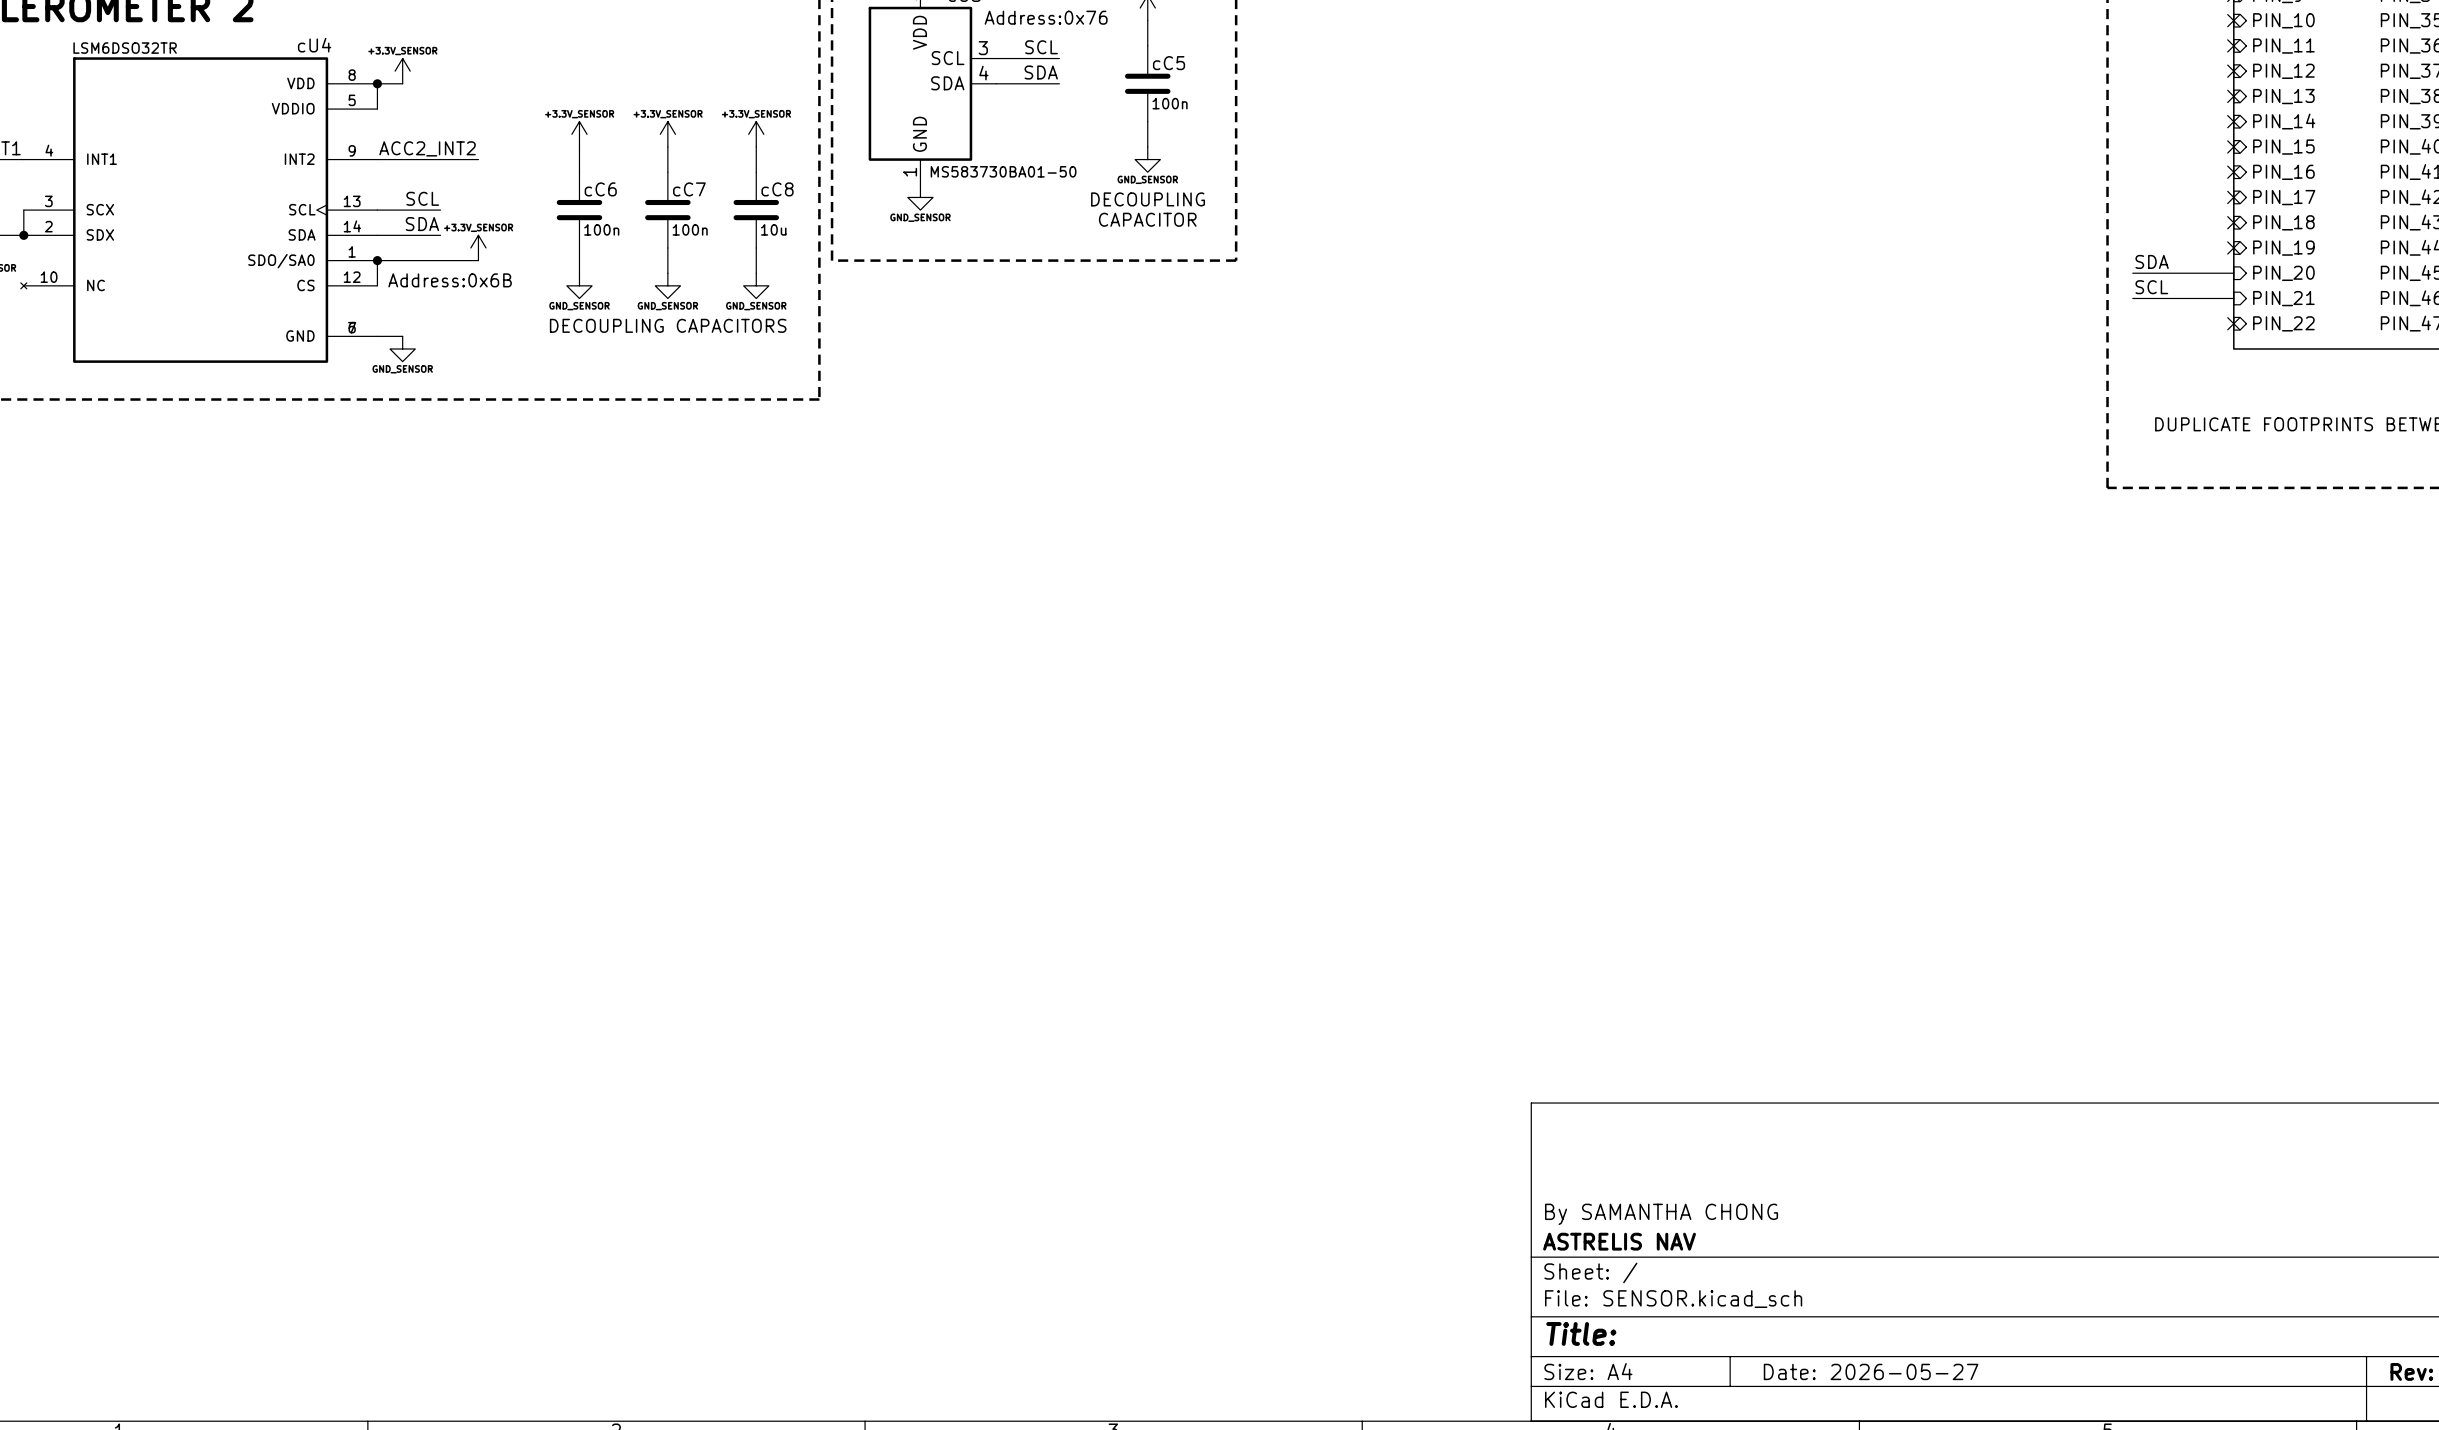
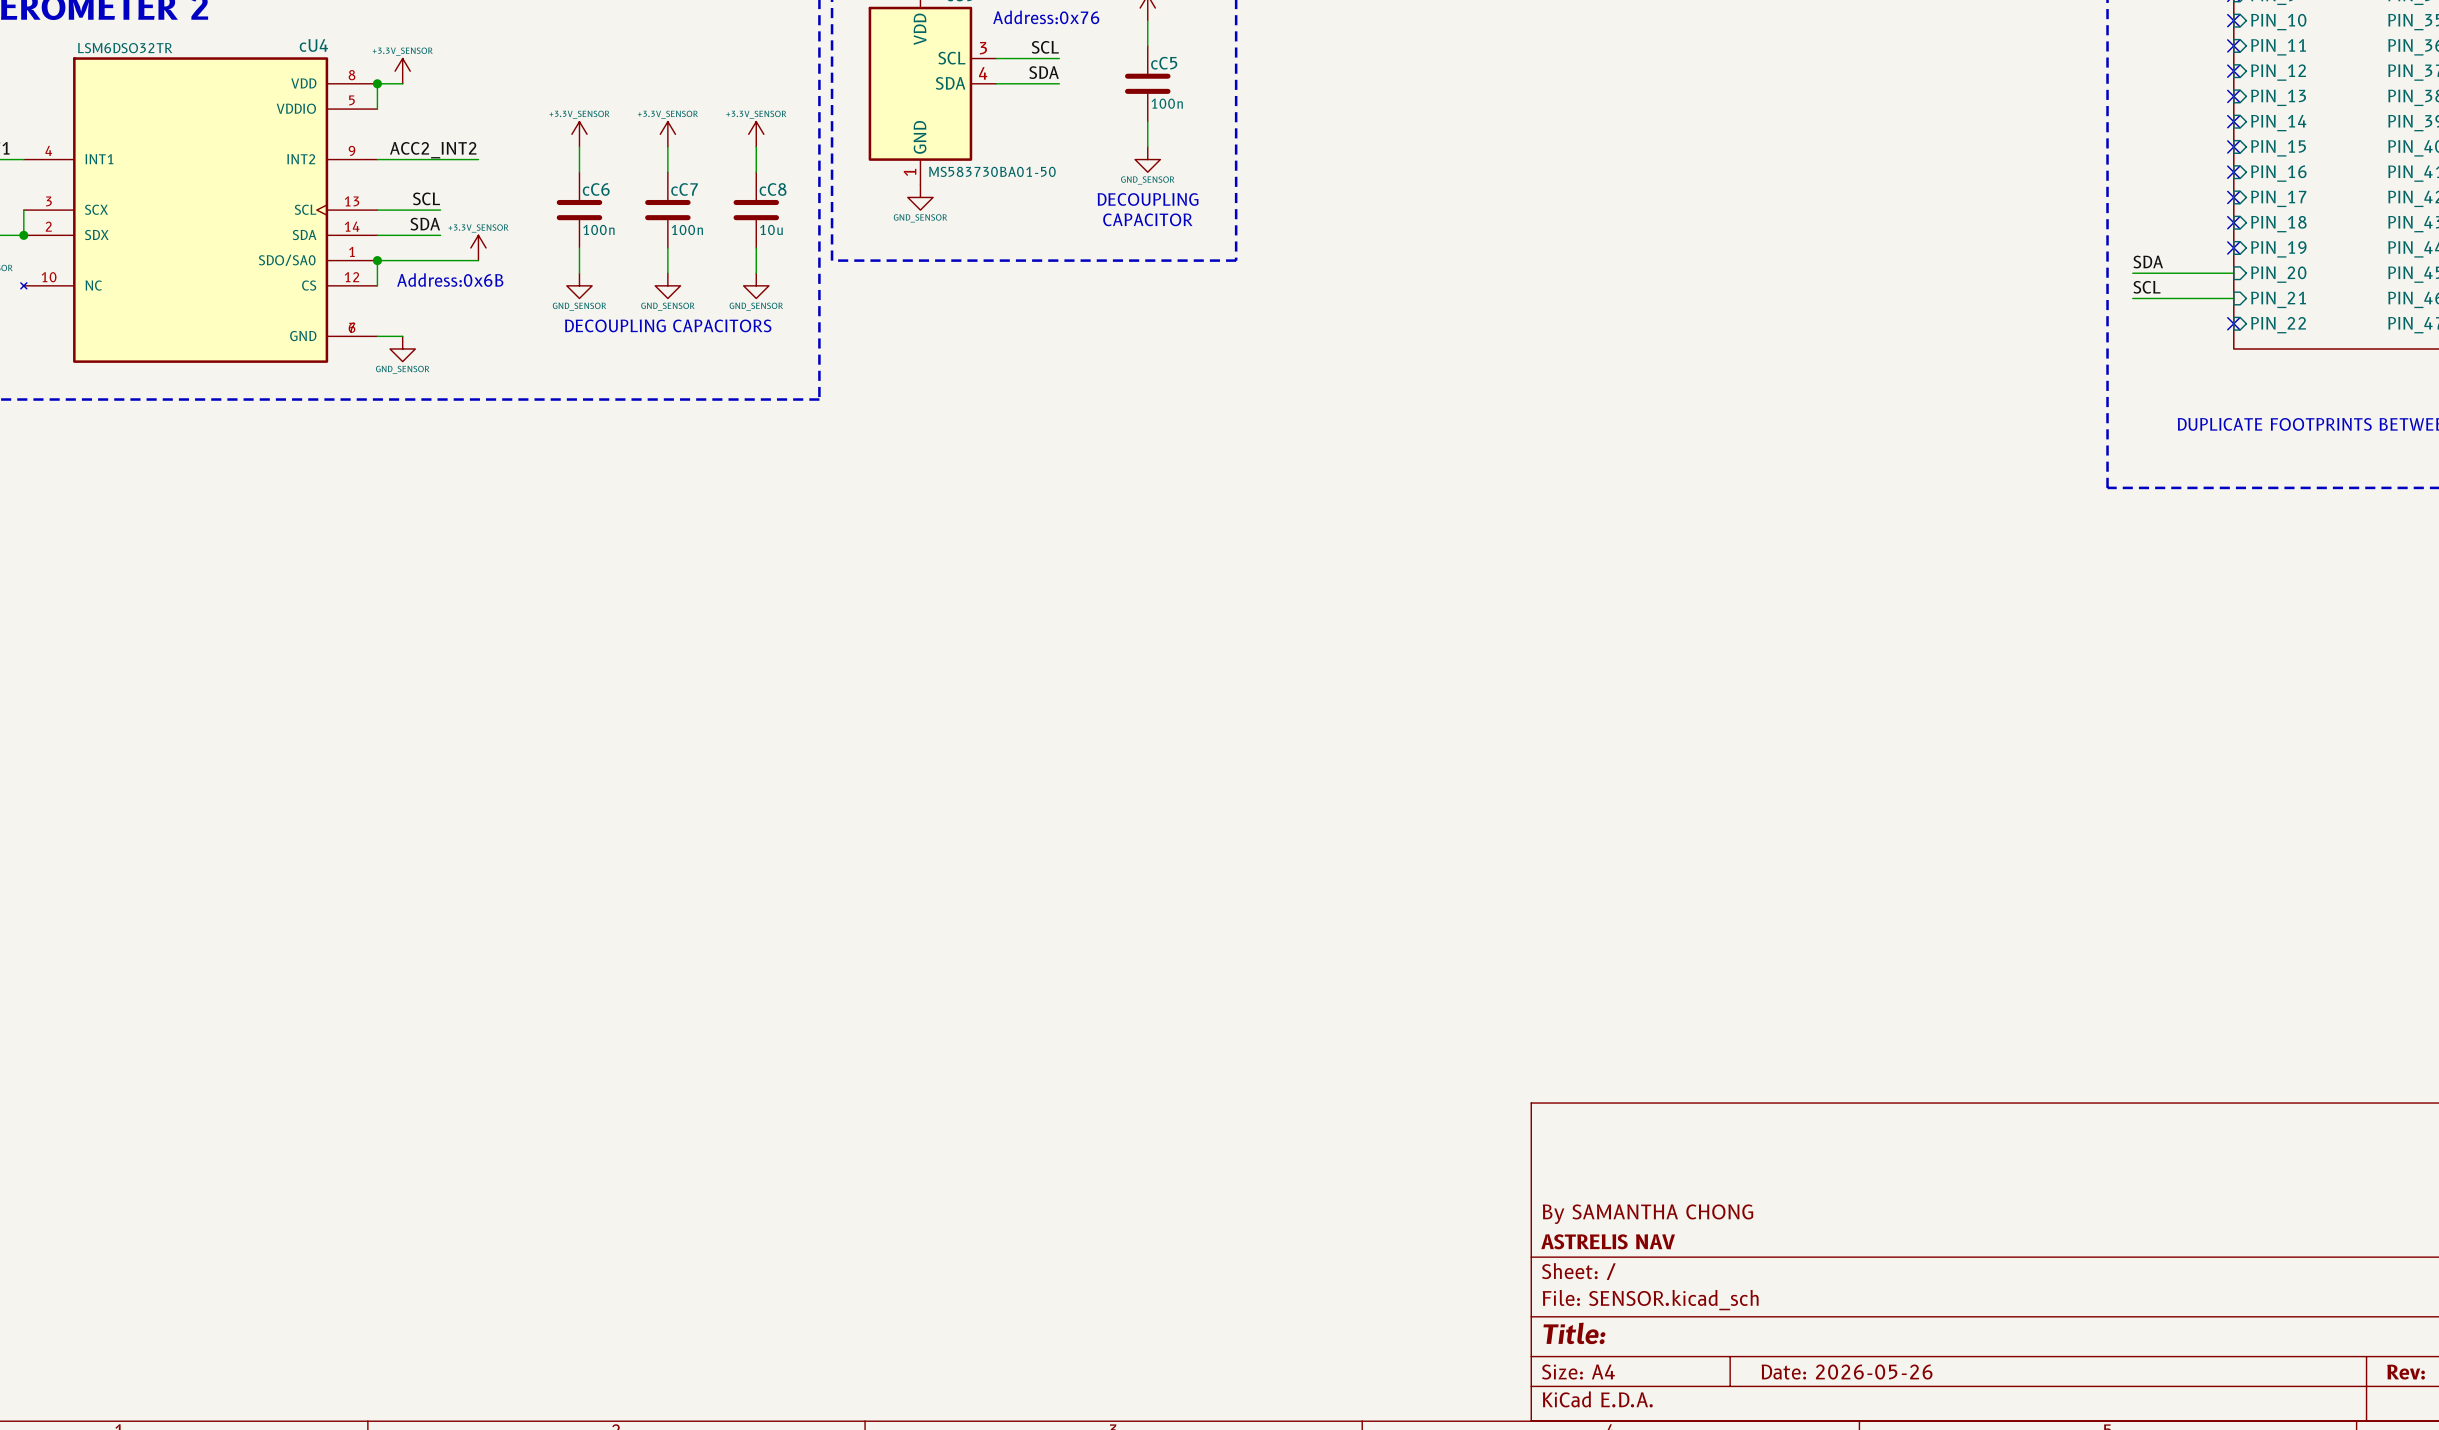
title block: Date: 2026-05-27 (1871, 1371) -> Date: 2026-05-26 (1847, 1372)

